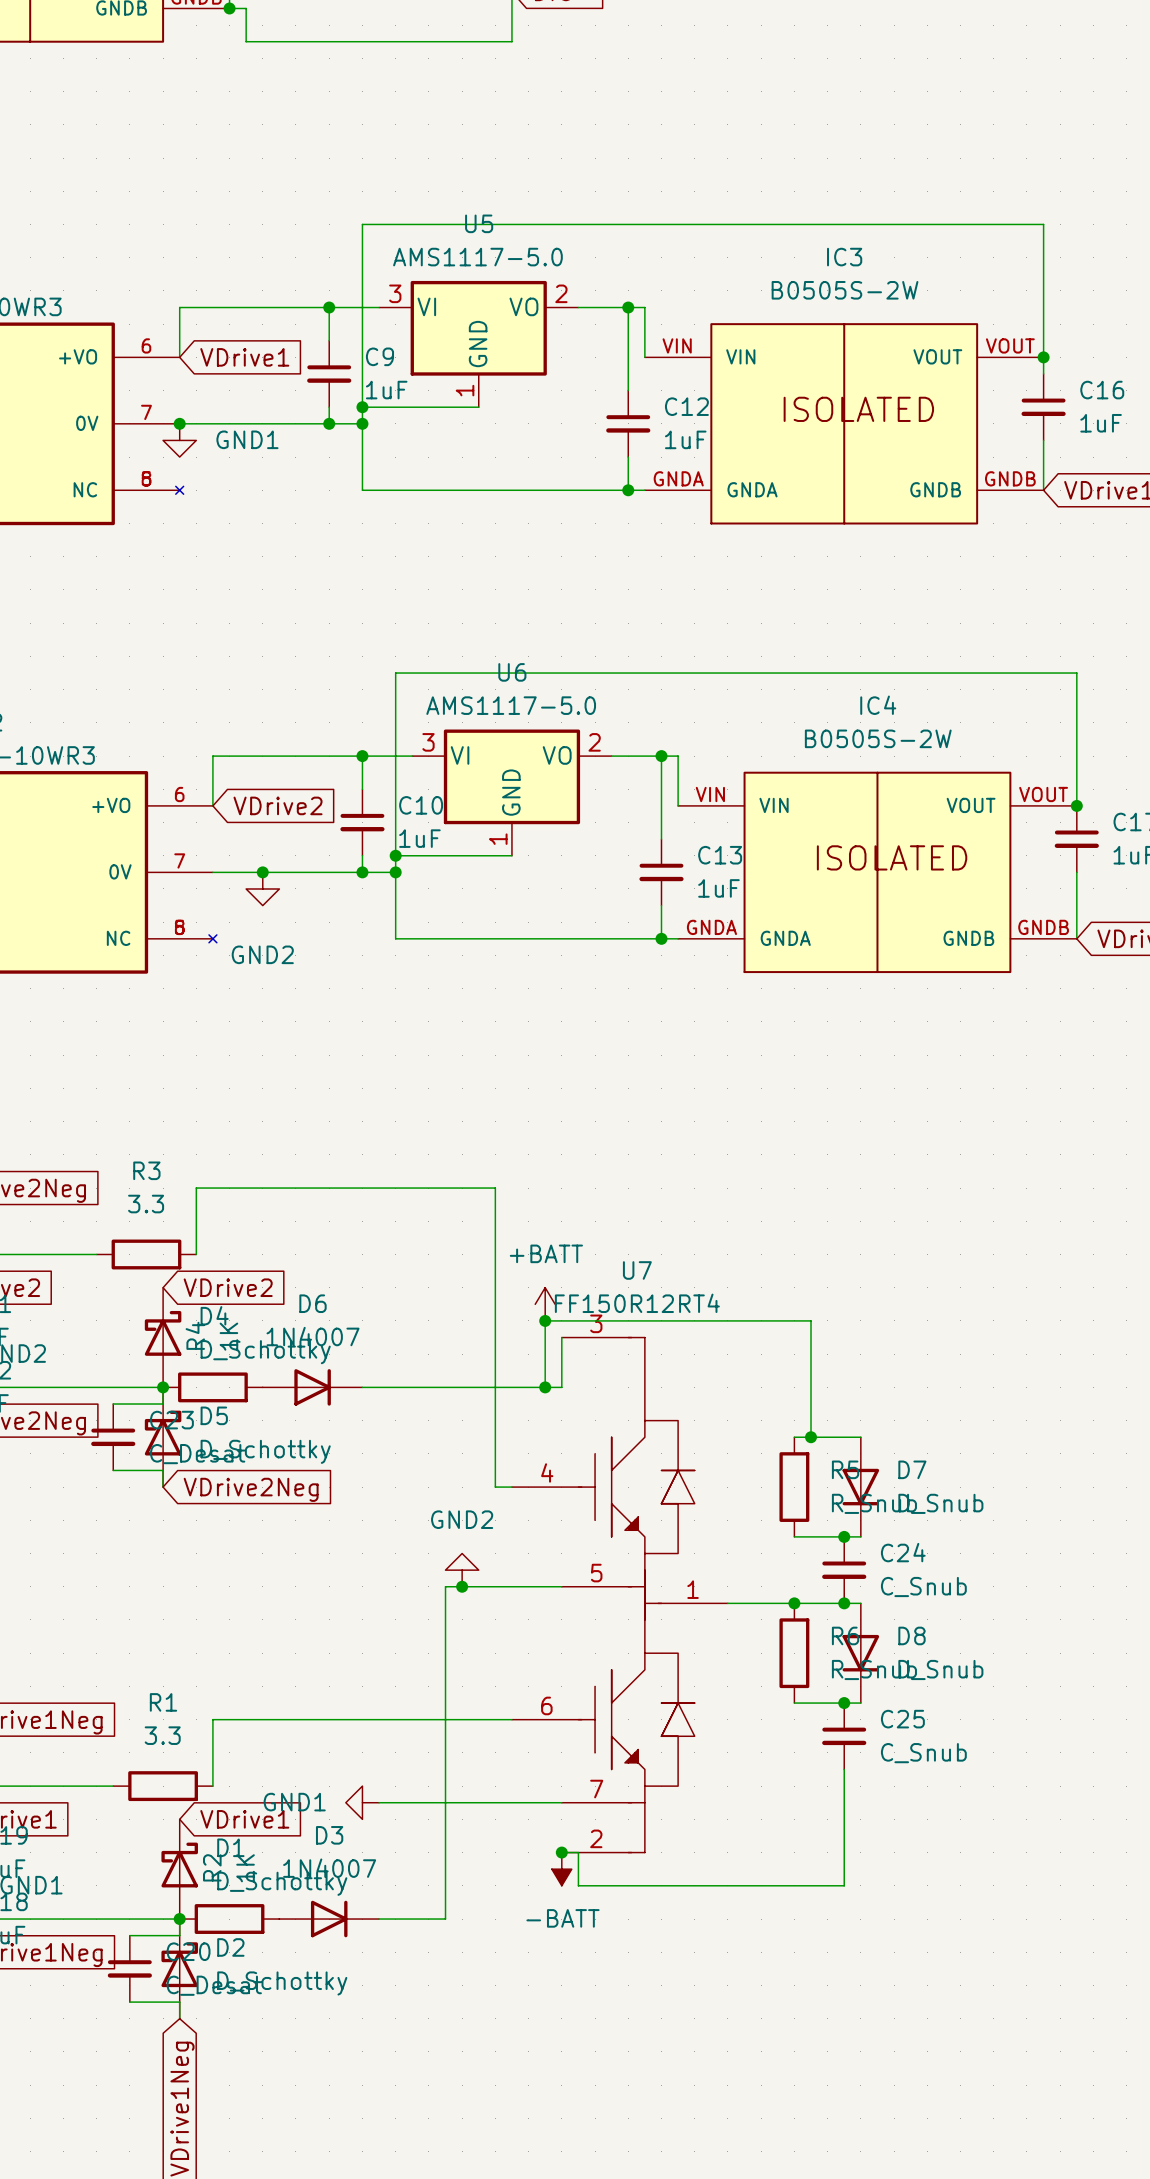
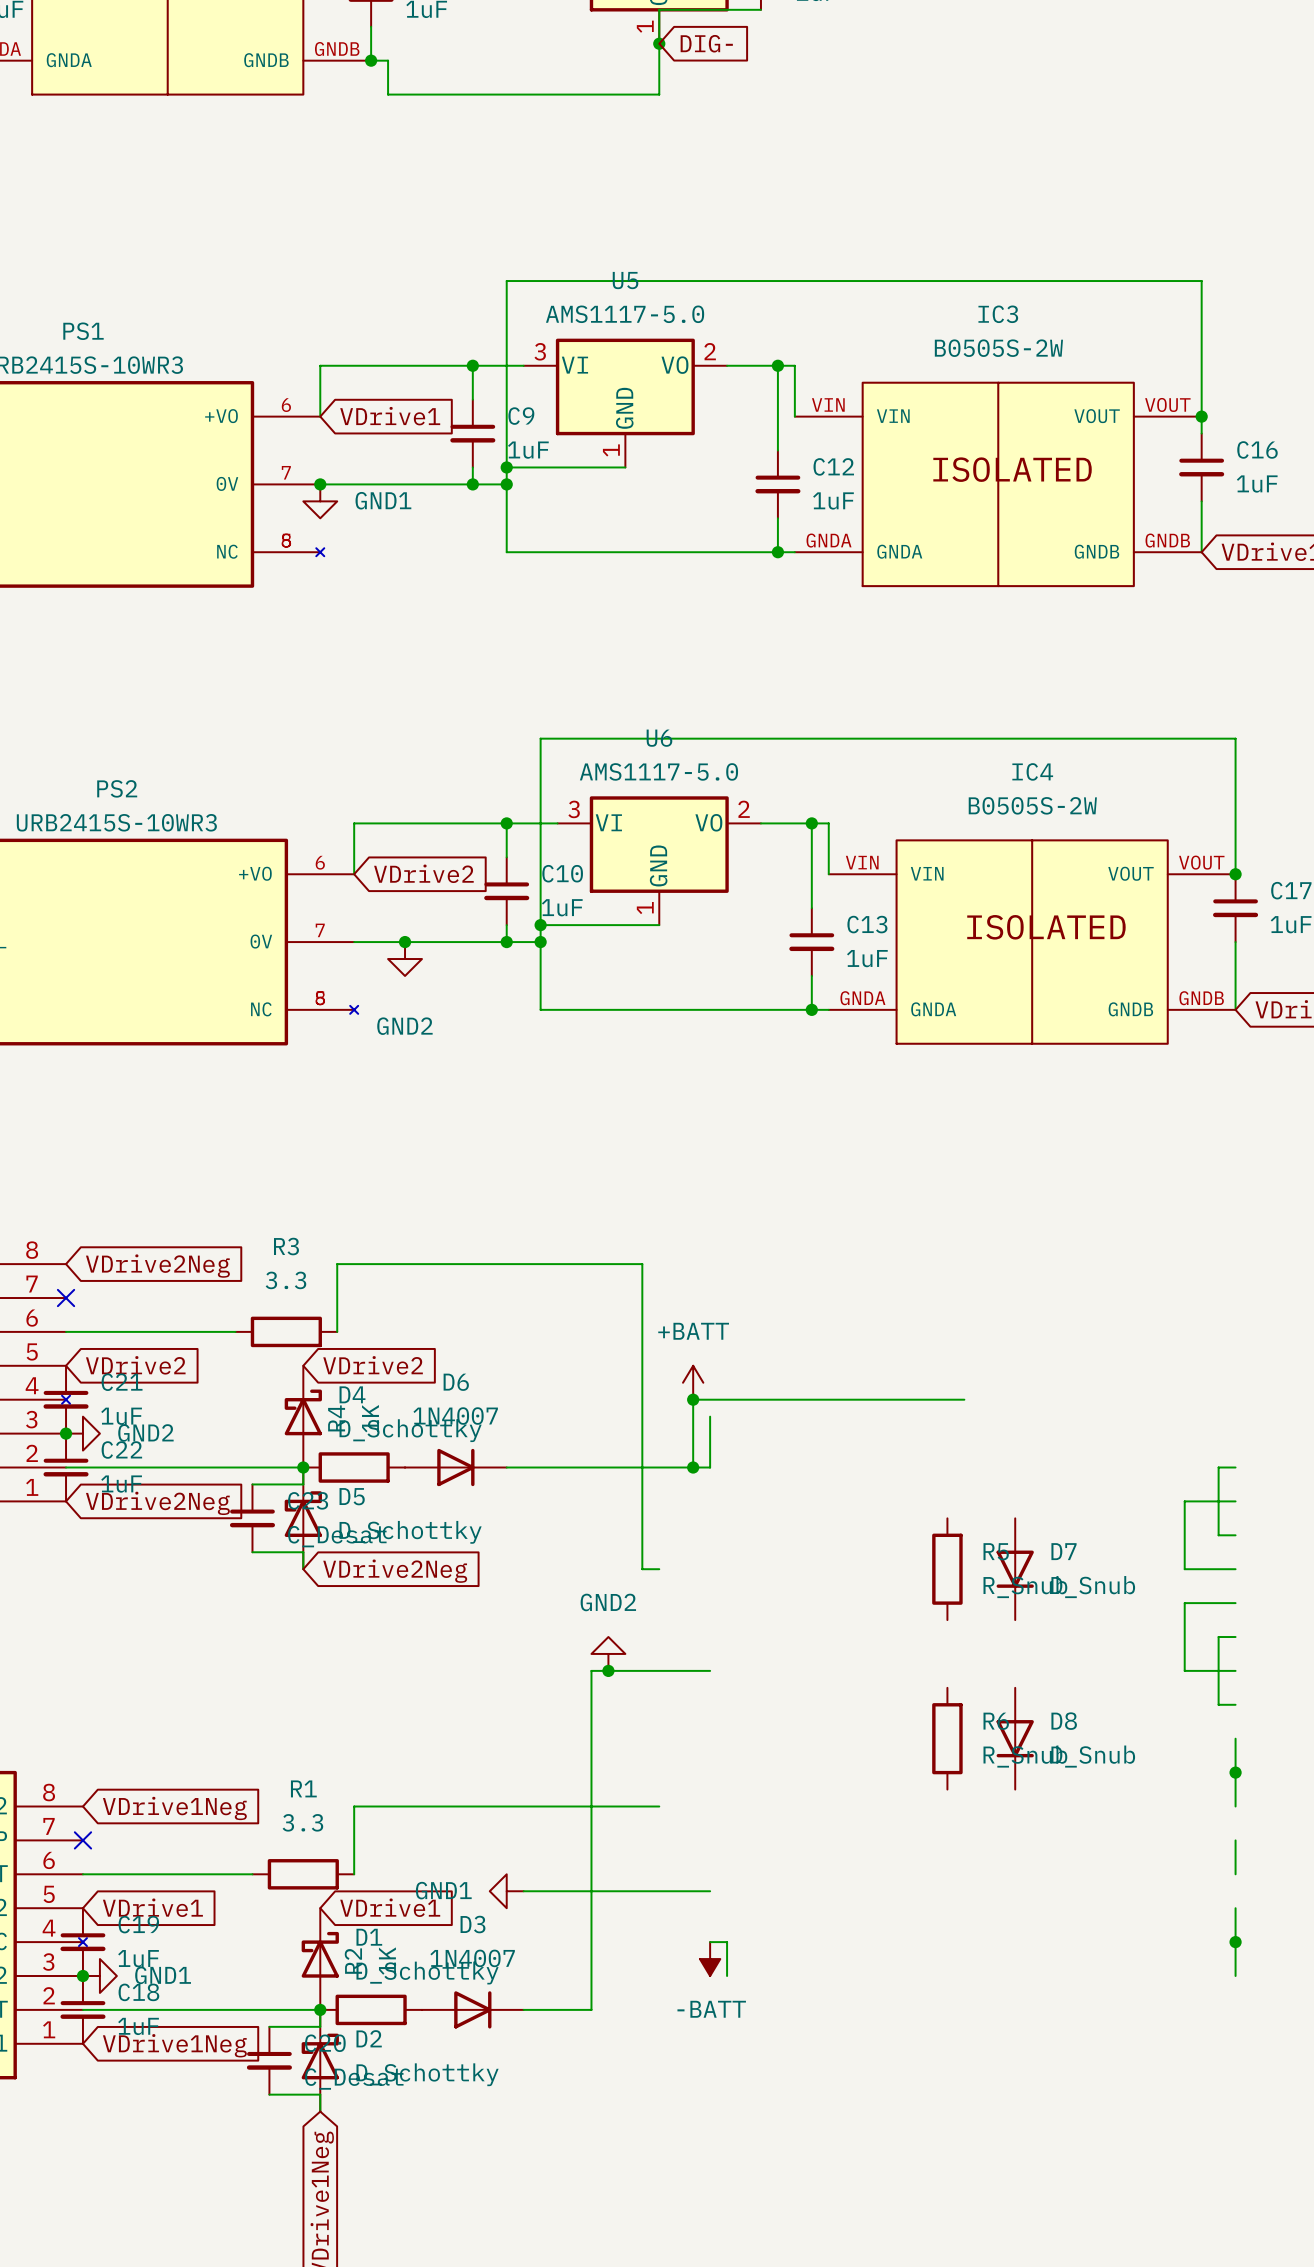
wire: (811, 1320) (811, 1437) -> none
wire: none -> (1235, 1467) (1218, 1467) (1218, 1535) (1235, 1535)
wire: none -> (1235, 1501) (1184, 1501) (1184, 1569) (1235, 1569)
wire: (794, 1437) (860, 1437) -> none
junction: (811, 1437) -> none
wire: none -> (1235, 1603) (1184, 1603) (1184, 1670) (1235, 1670)
wire: (794, 1536) (860, 1536) -> none
junction: (844, 1536) -> none
wire: none -> (1235, 1637) (1218, 1637) (1218, 1704) (1235, 1704)
C24: C_Snub (844, 1570) -> none
U7: FF150R12RT4 (619, 1595) -> none
wire: (727, 1603) (860, 1603) -> none
junction: (794, 1603) -> none
junction: (844, 1603) -> none
wire: none -> (1235, 1738) (1235, 1806)
junction: none -> (1235, 1772)
wire: (794, 1703) (860, 1703) -> none
junction: (844, 1703) -> none
C25: C_Snub (844, 1736) -> none
wire: none -> (1235, 1840) (1235, 1874)
wire: (844, 1769) (844, 1885) (578, 1885) -> none
wire: none -> (1235, 1908) (1235, 1976)
junction: (561, 1852) -> none
junction: none -> (1235, 1942)

